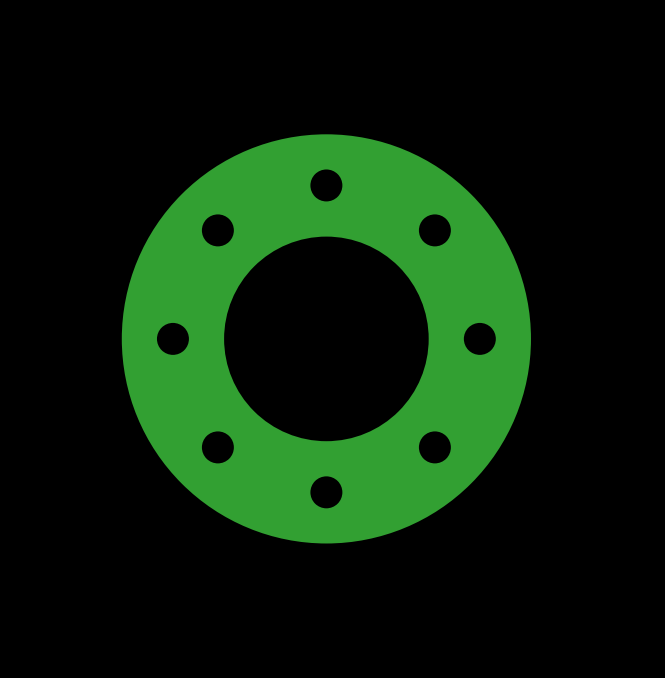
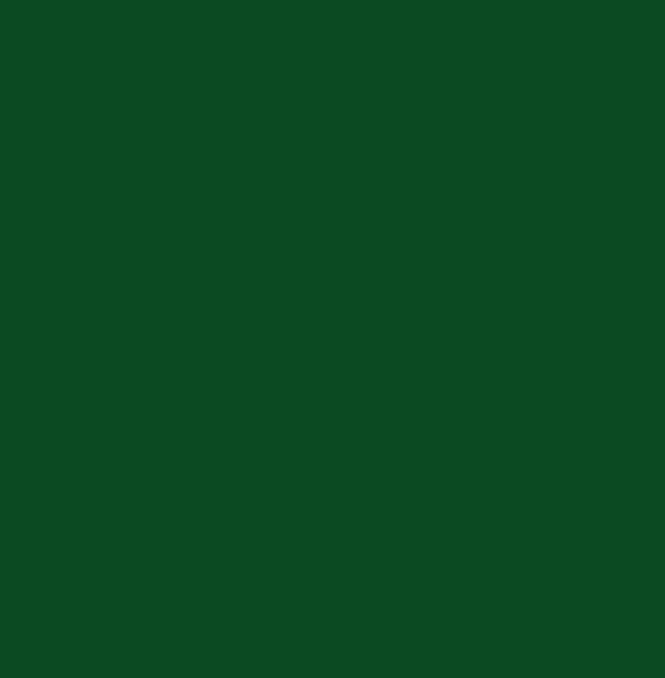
part: (326, 338) -> none

